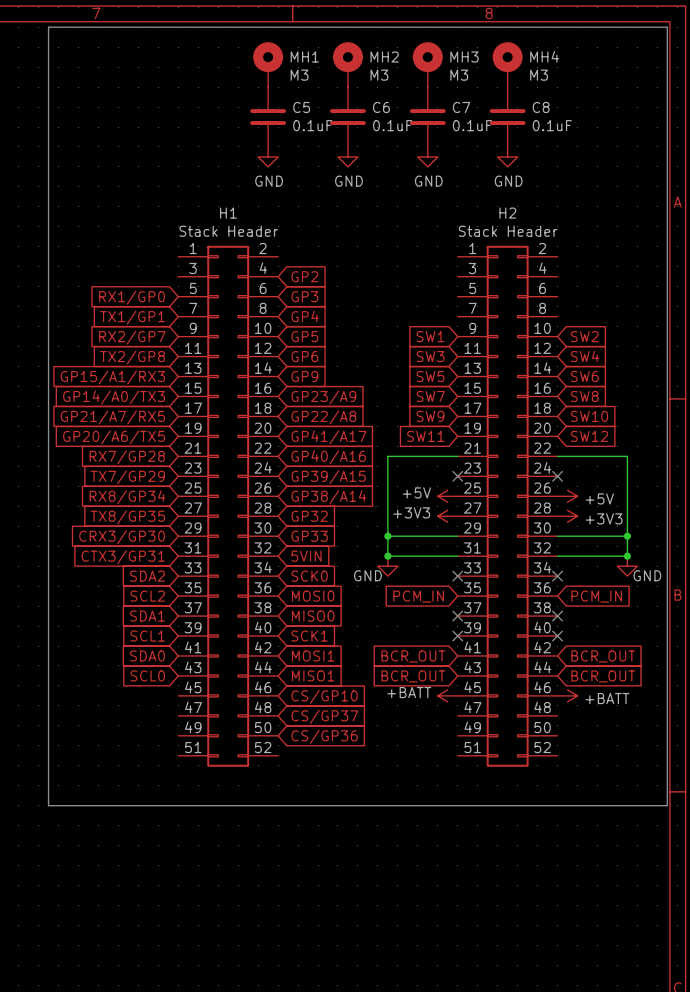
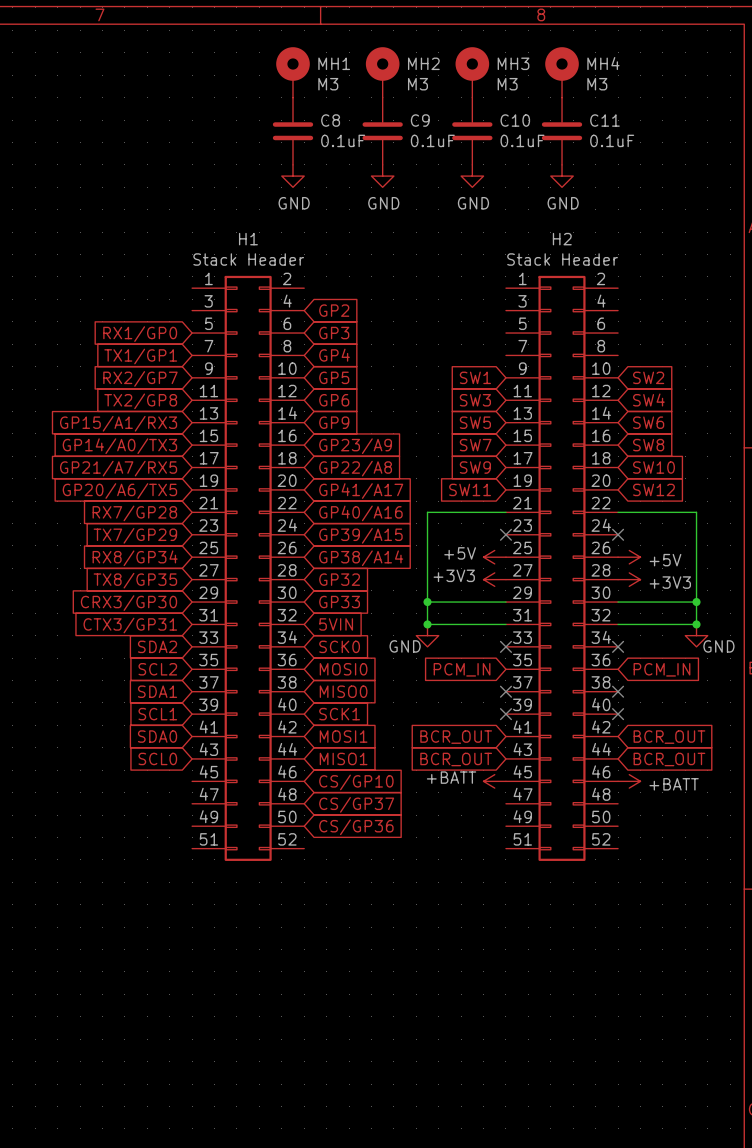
line: (48, 27) (667, 27) (667, 805) (48, 805) (48, 27) -> none
C5 name: C5 (301, 107) -> C8 (330, 120)
C6 name: C6 (381, 107) -> C9 (420, 120)
C7 name: C7 (461, 107) -> C10 (515, 120)
C8 name: C8 (541, 107) -> C11 (604, 120)

